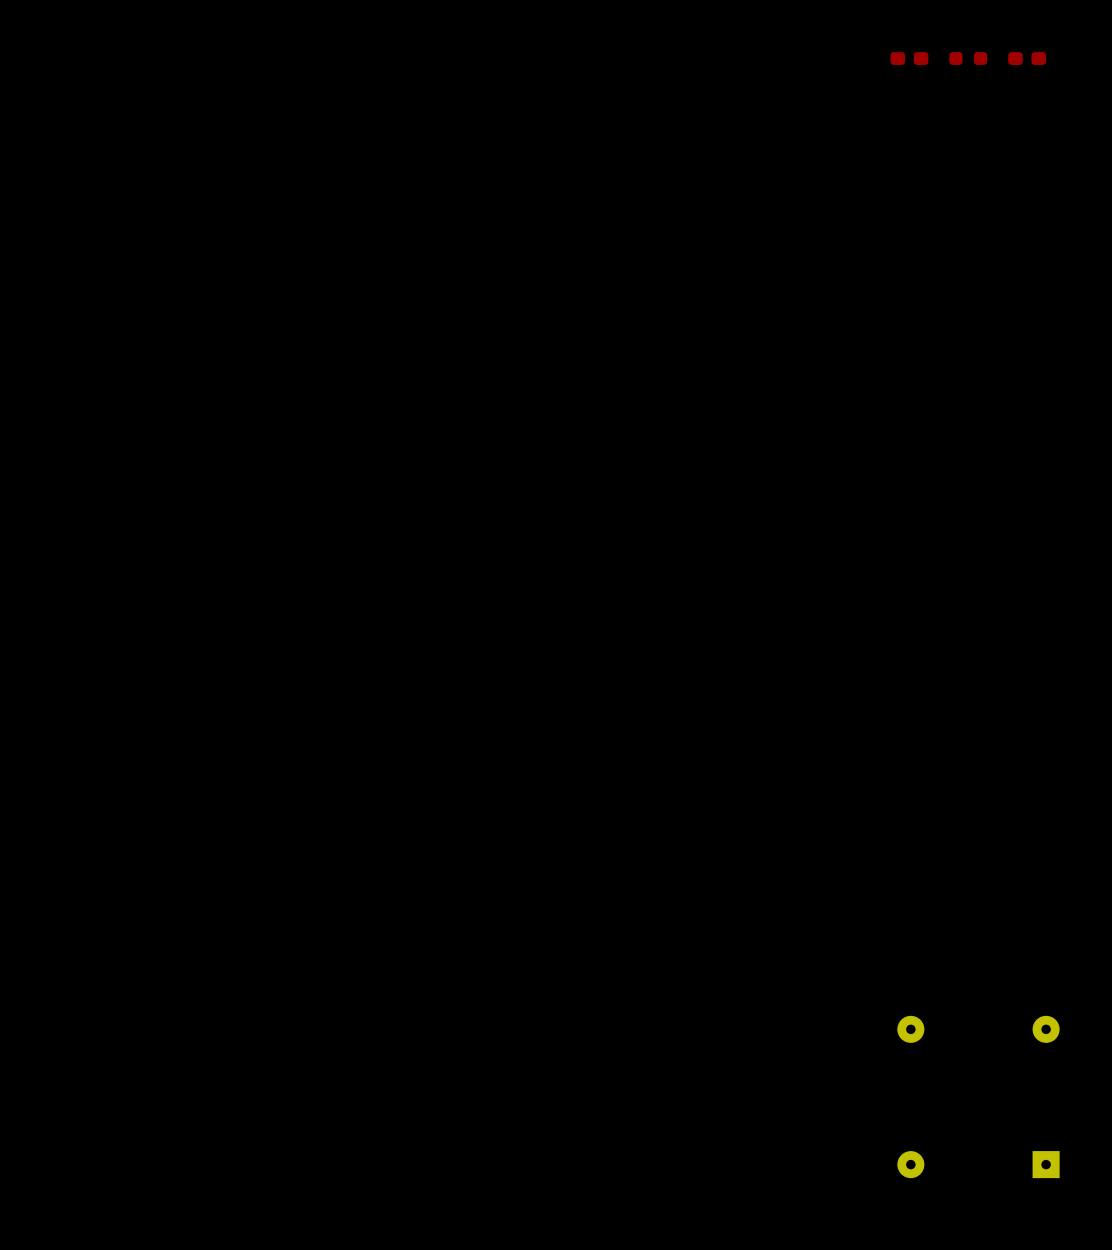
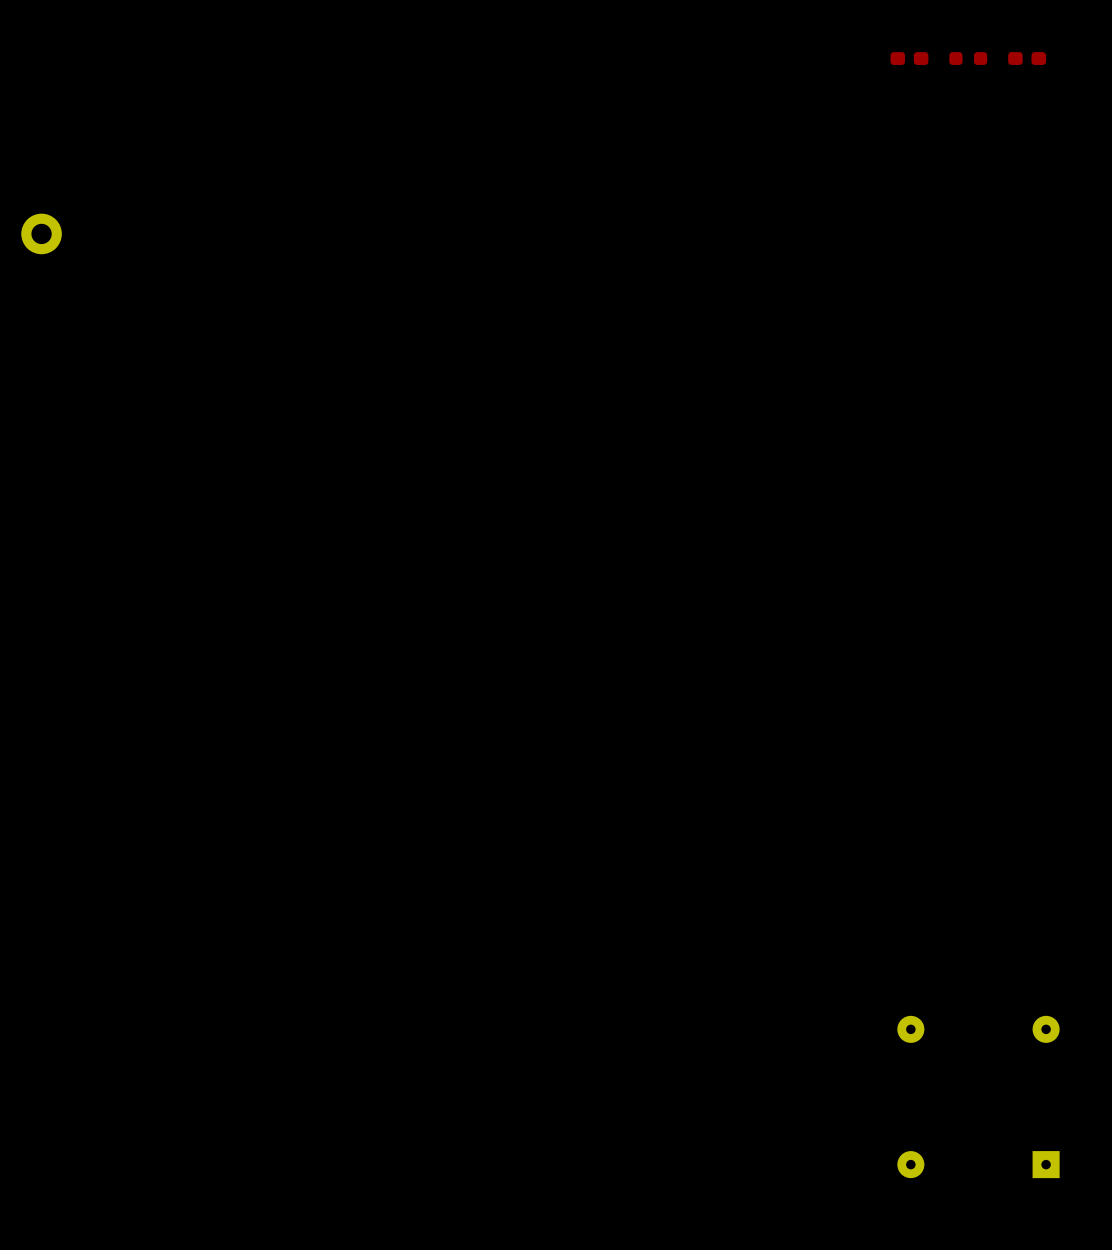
part: none -> (41, 233)

